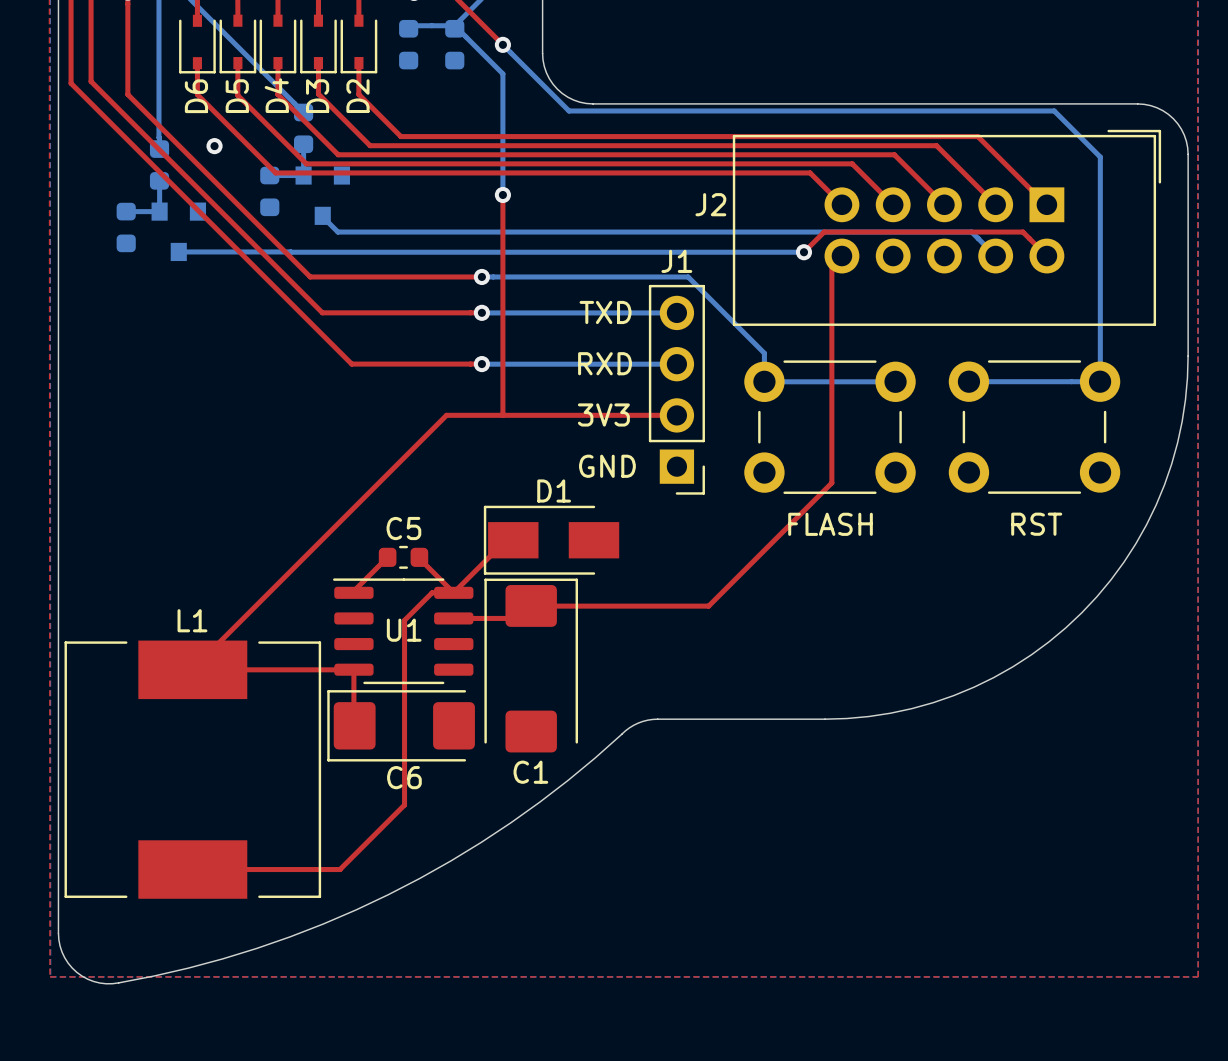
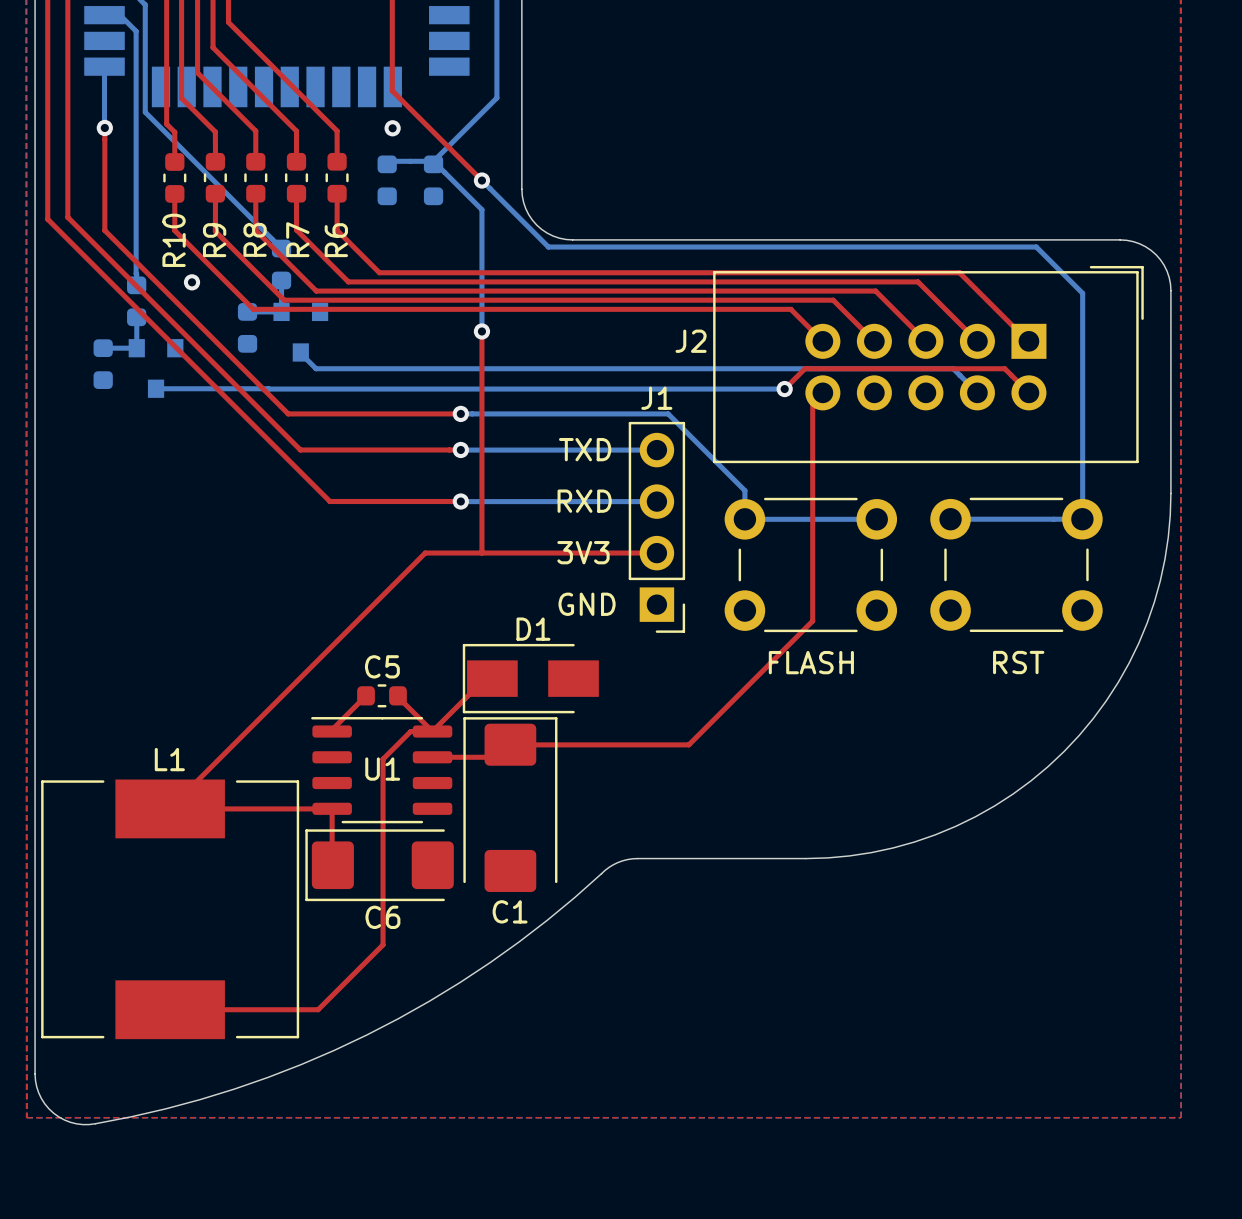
R10: none -> (174, 177)
R9: none -> (215, 177)
R8: none -> (255, 177)
R7: none -> (296, 177)
R6: none -> (337, 177)
D6: (197, 44) -> none
D5: (237, 44) -> none
D4: (277, 44) -> none
D3: (318, 44) -> none
D2: (358, 44) -> none

